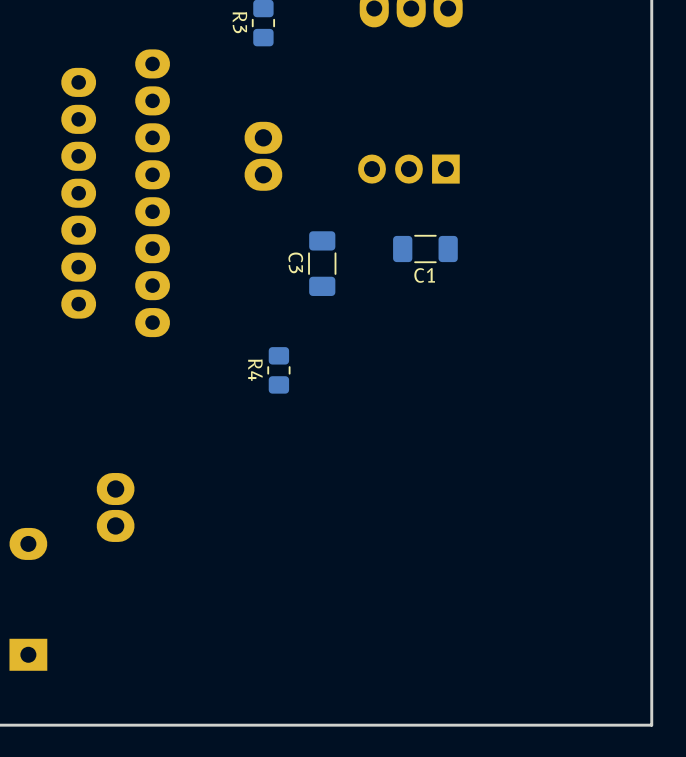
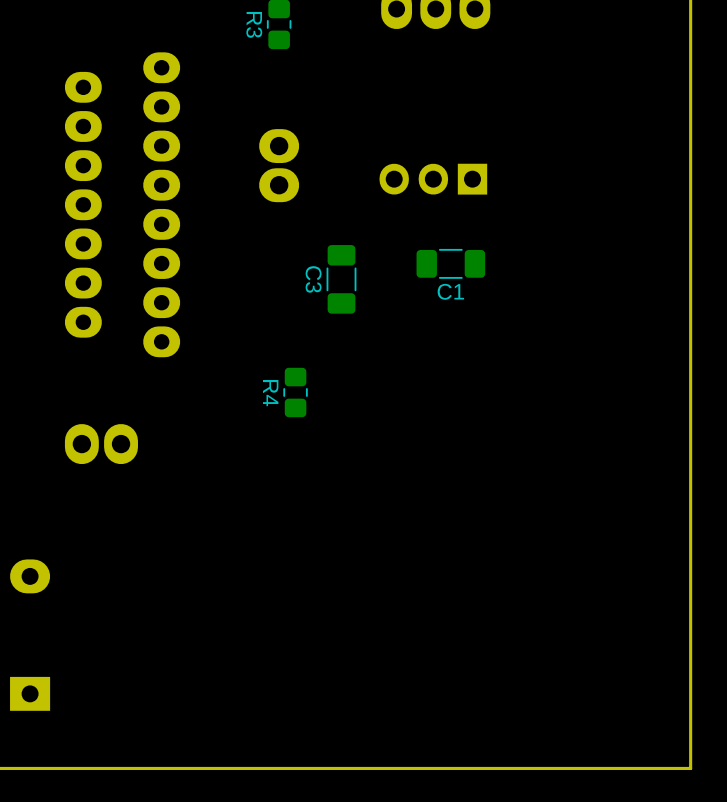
part rotation: 0° (115, 507) -> 90° clockwise (101, 444)
part position: (115, 507) -> (101, 444)

